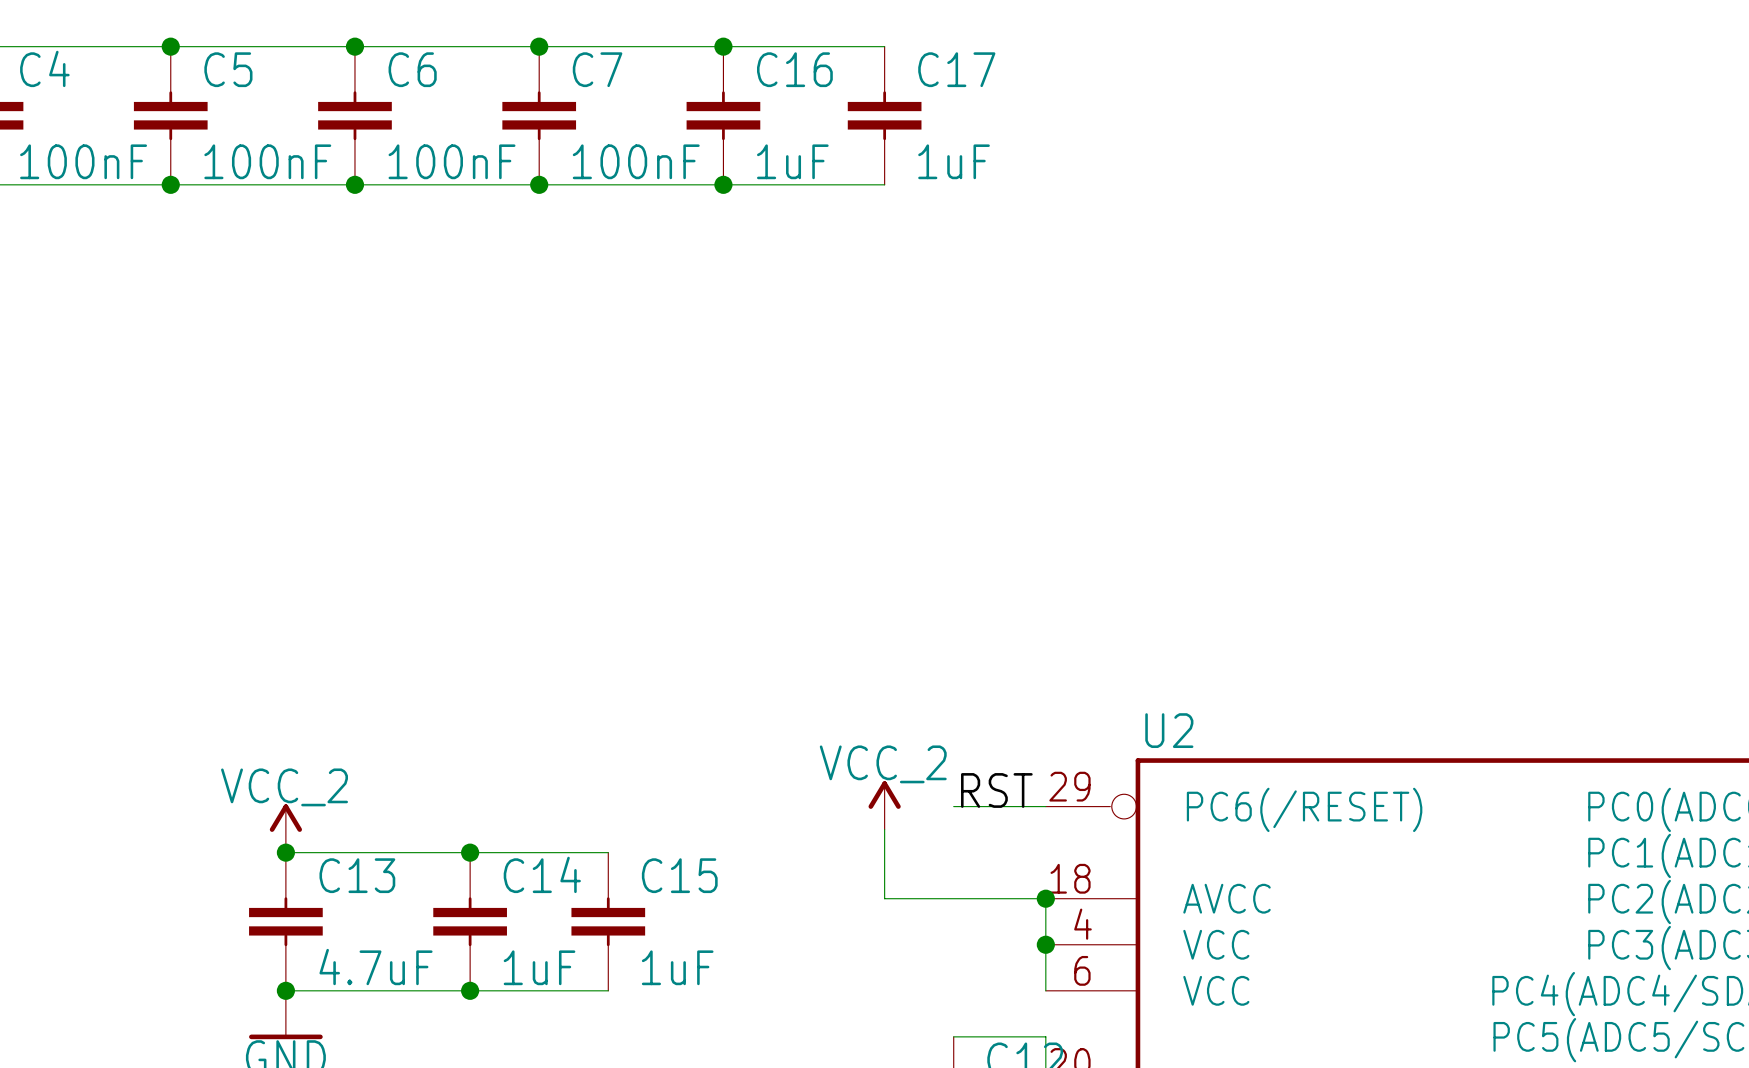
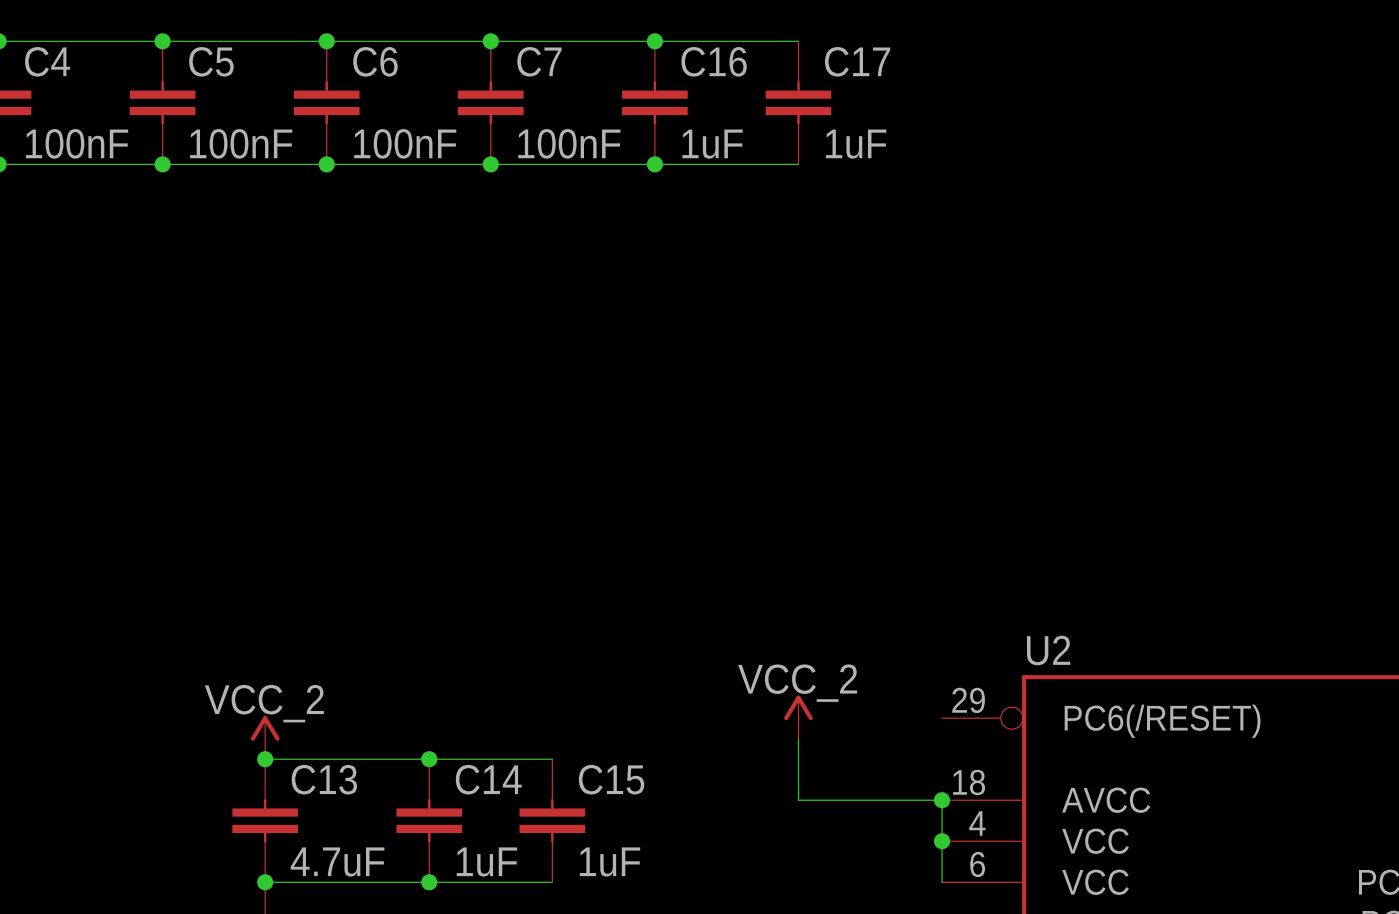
label: RST (996, 790) -> none
wire: (953, 806) (1045, 806) -> none

